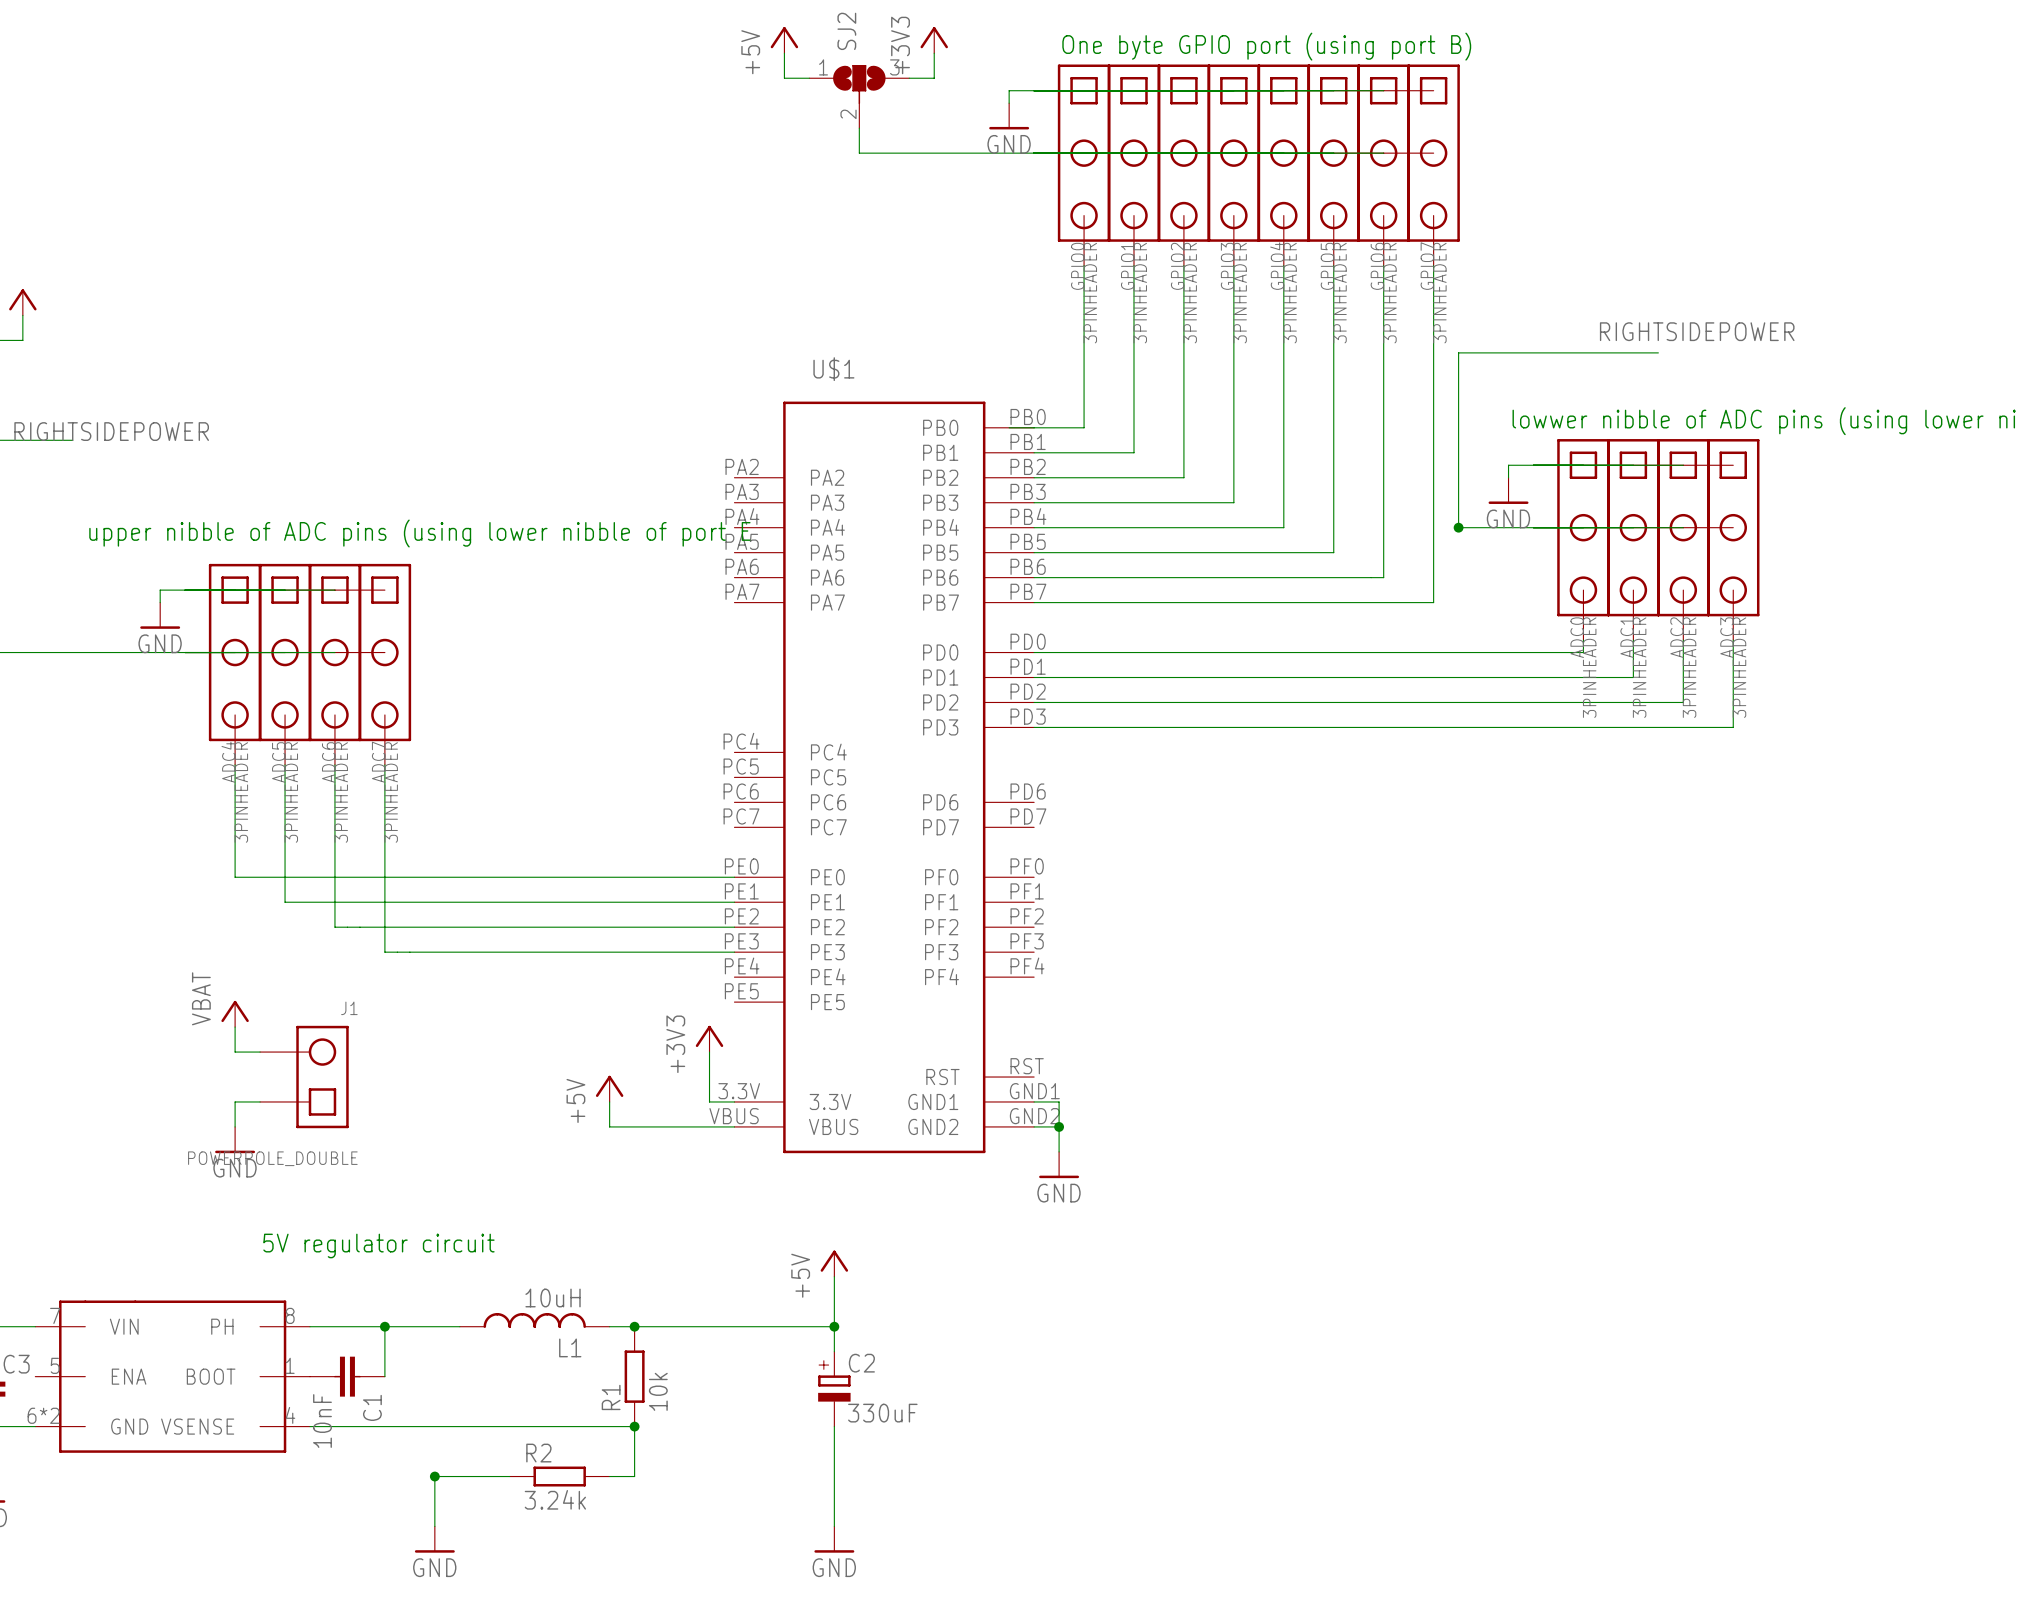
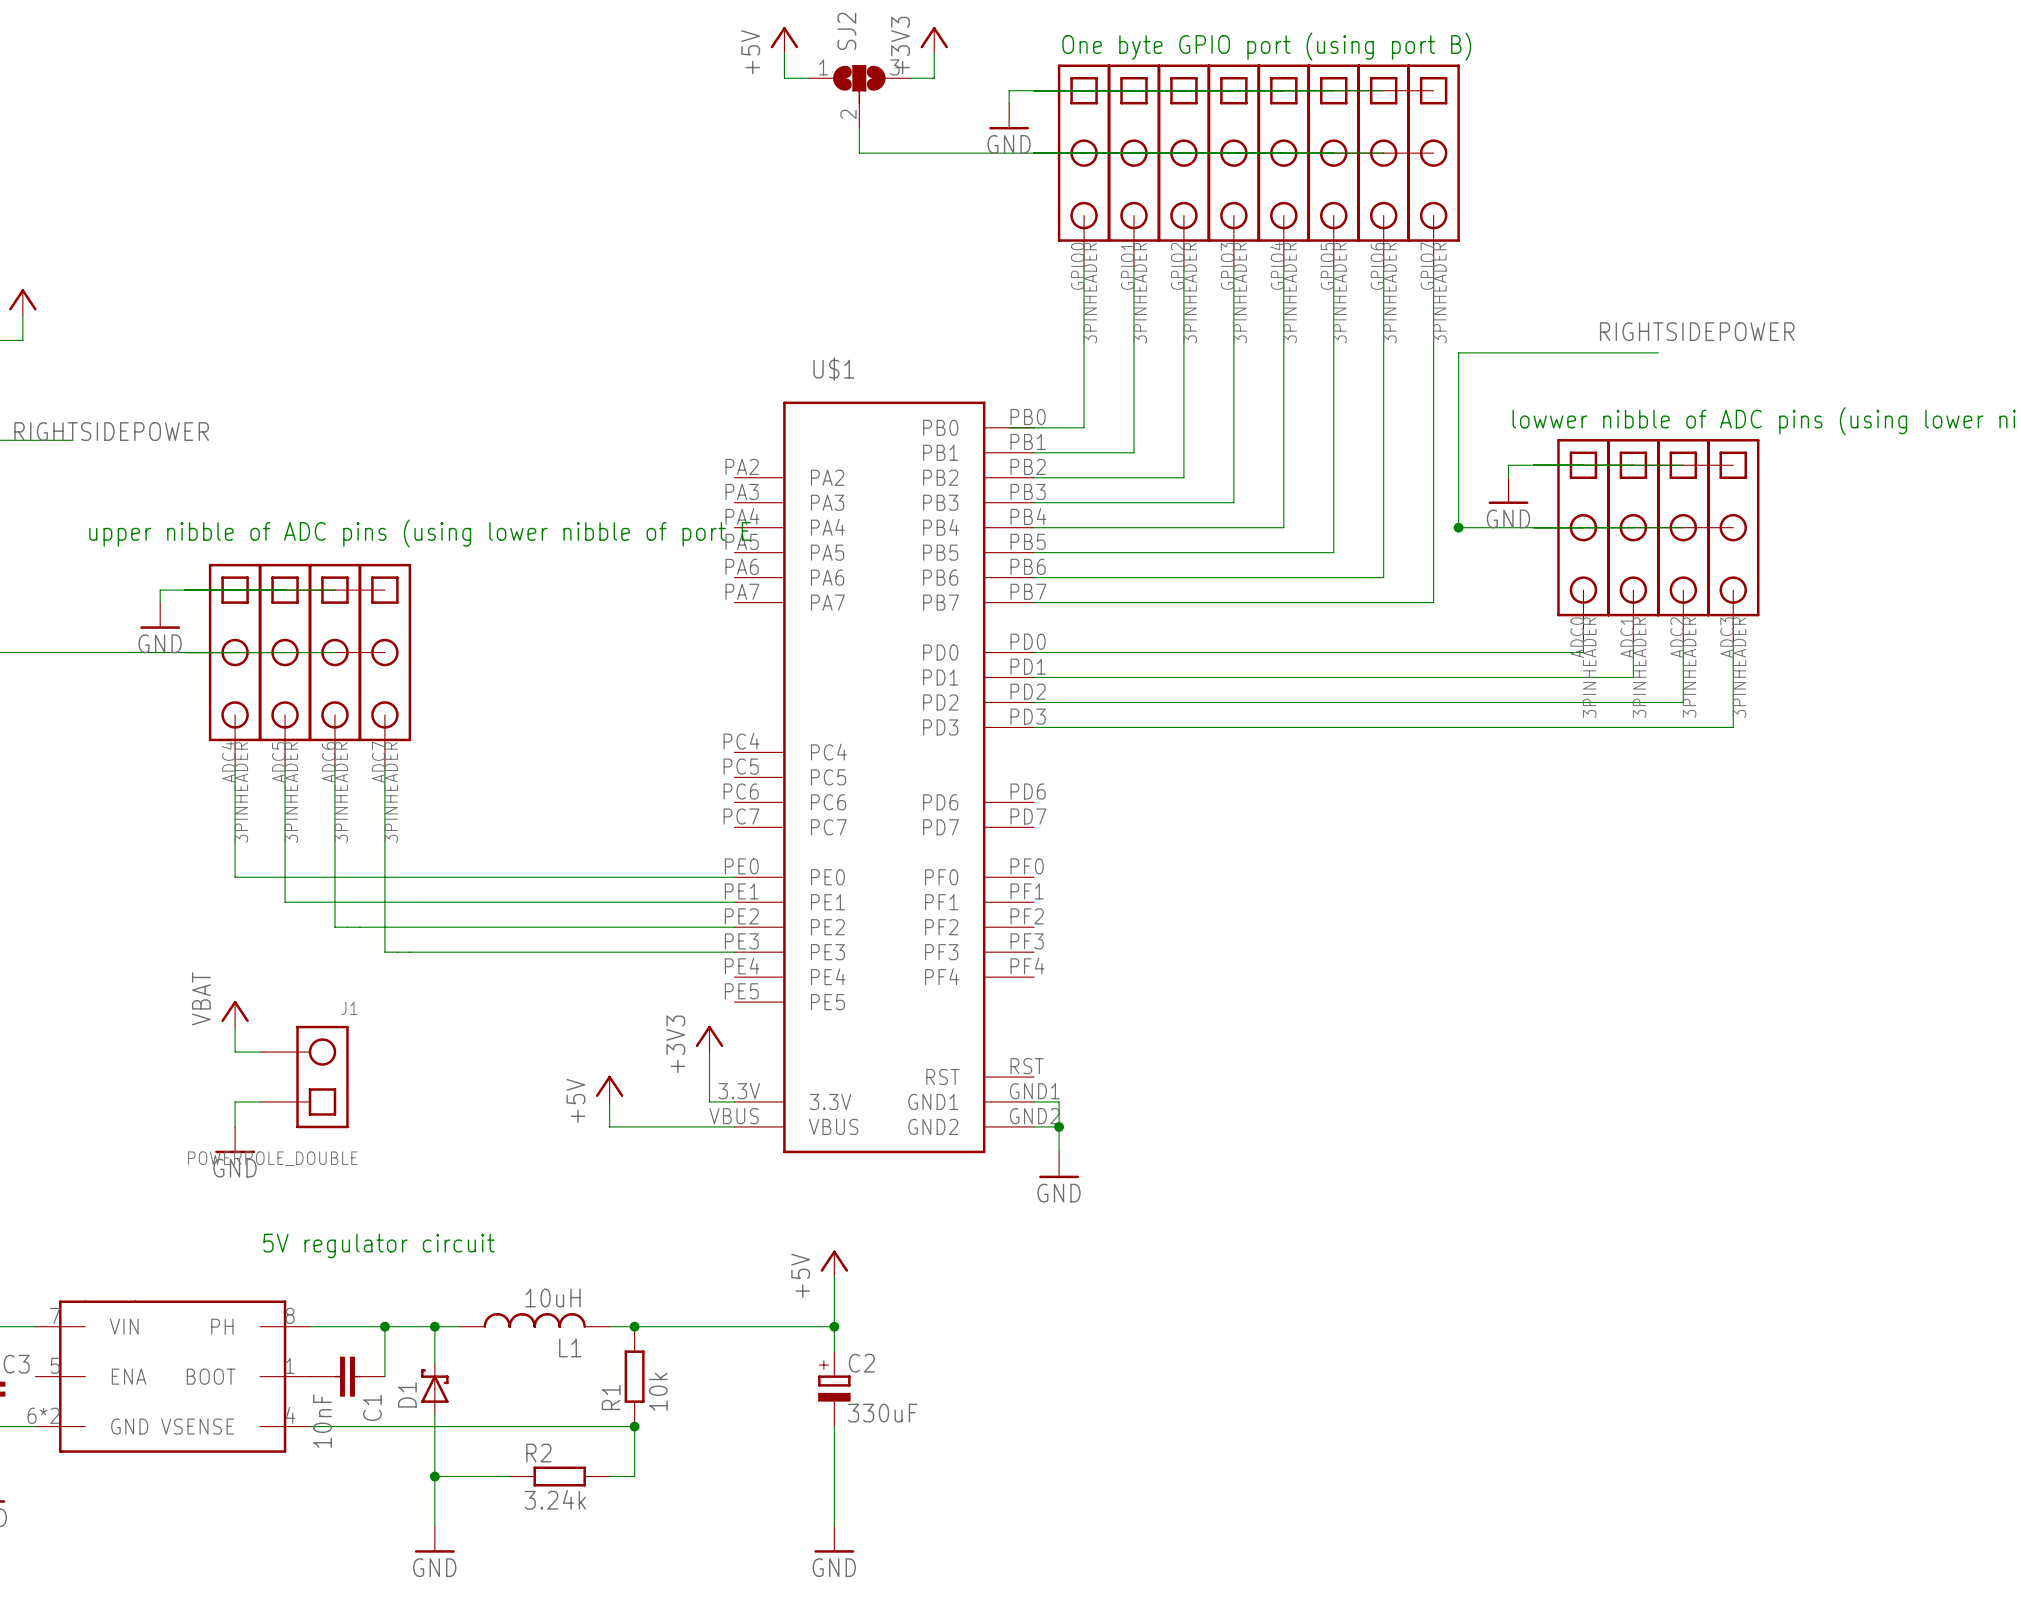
wire: none -> (434, 1326) (434, 1364)
junction: none -> (434, 1326)
D1: none -> (434, 1389)
wire: none -> (434, 1414) (434, 1476)

